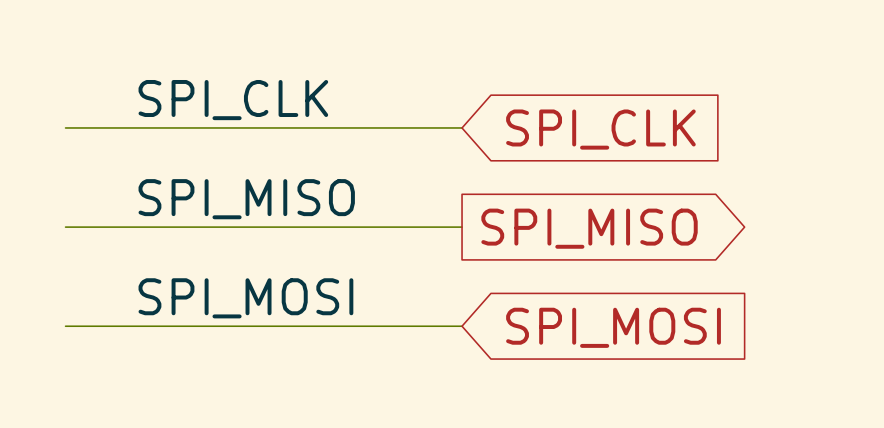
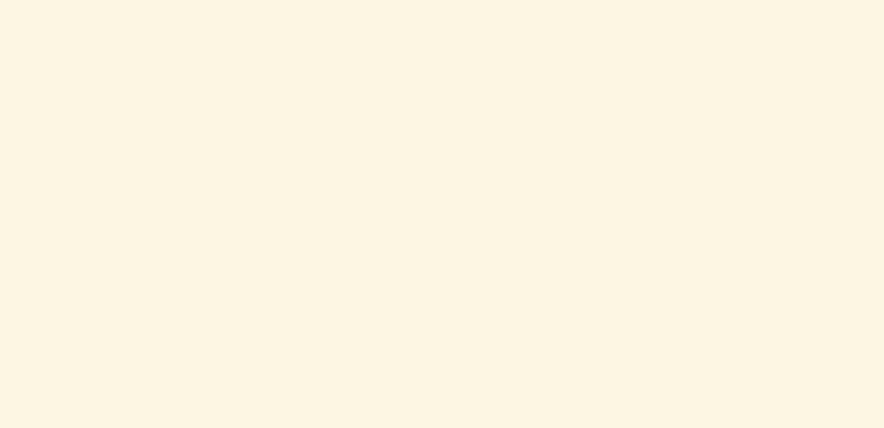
label: SPI_CLK (233, 100) -> none
wire: (65, 127) (462, 127) -> none
global label: SPI_CLK (600, 129) -> none
label: SPI_MISO (246, 199) -> none
wire: (65, 227) (462, 227) -> none
global label: SPI_MISO (589, 228) -> none
label: SPI_MOSI (245, 298) -> none
wire: (65, 326) (462, 326) -> none
global label: SPI_MOSI (613, 327) -> none

